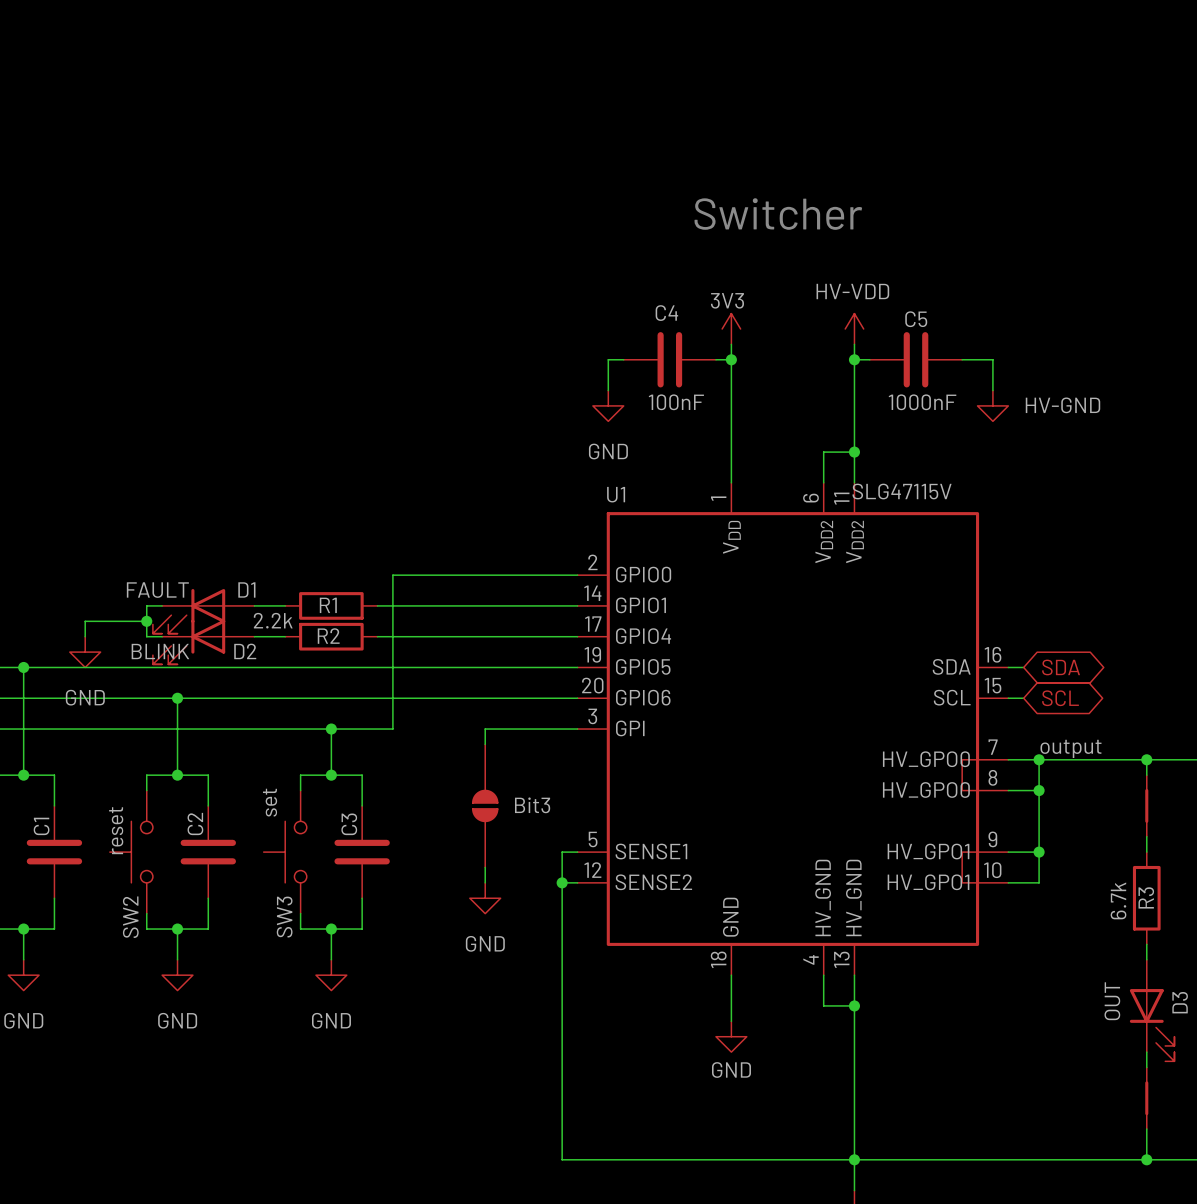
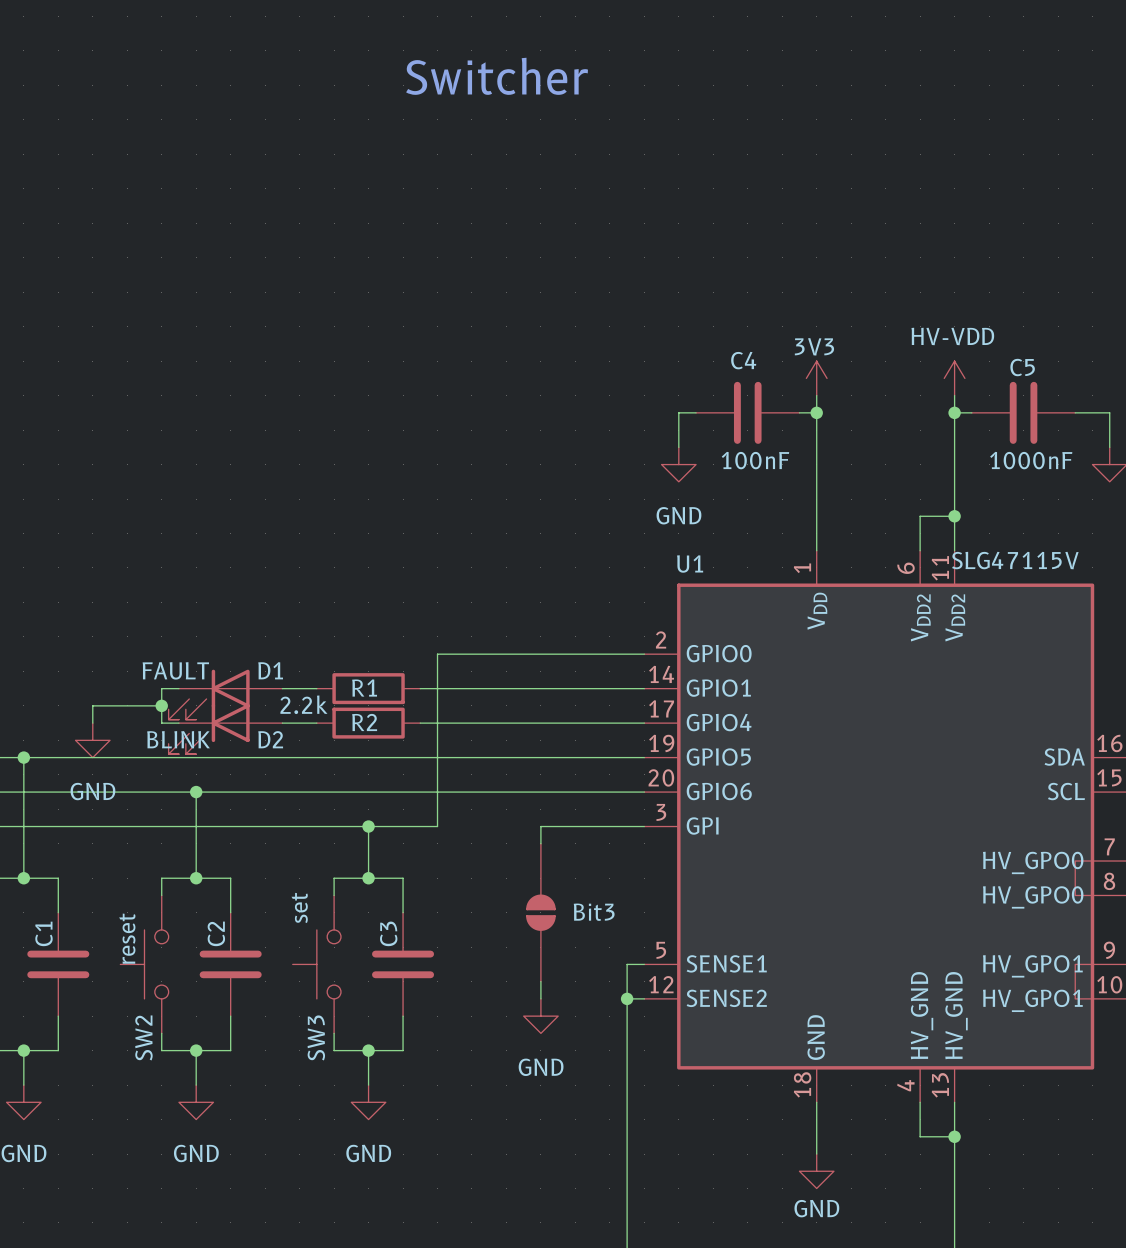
text: none -> Switcher (497, 76)
text: Switcher (778, 214) -> none

